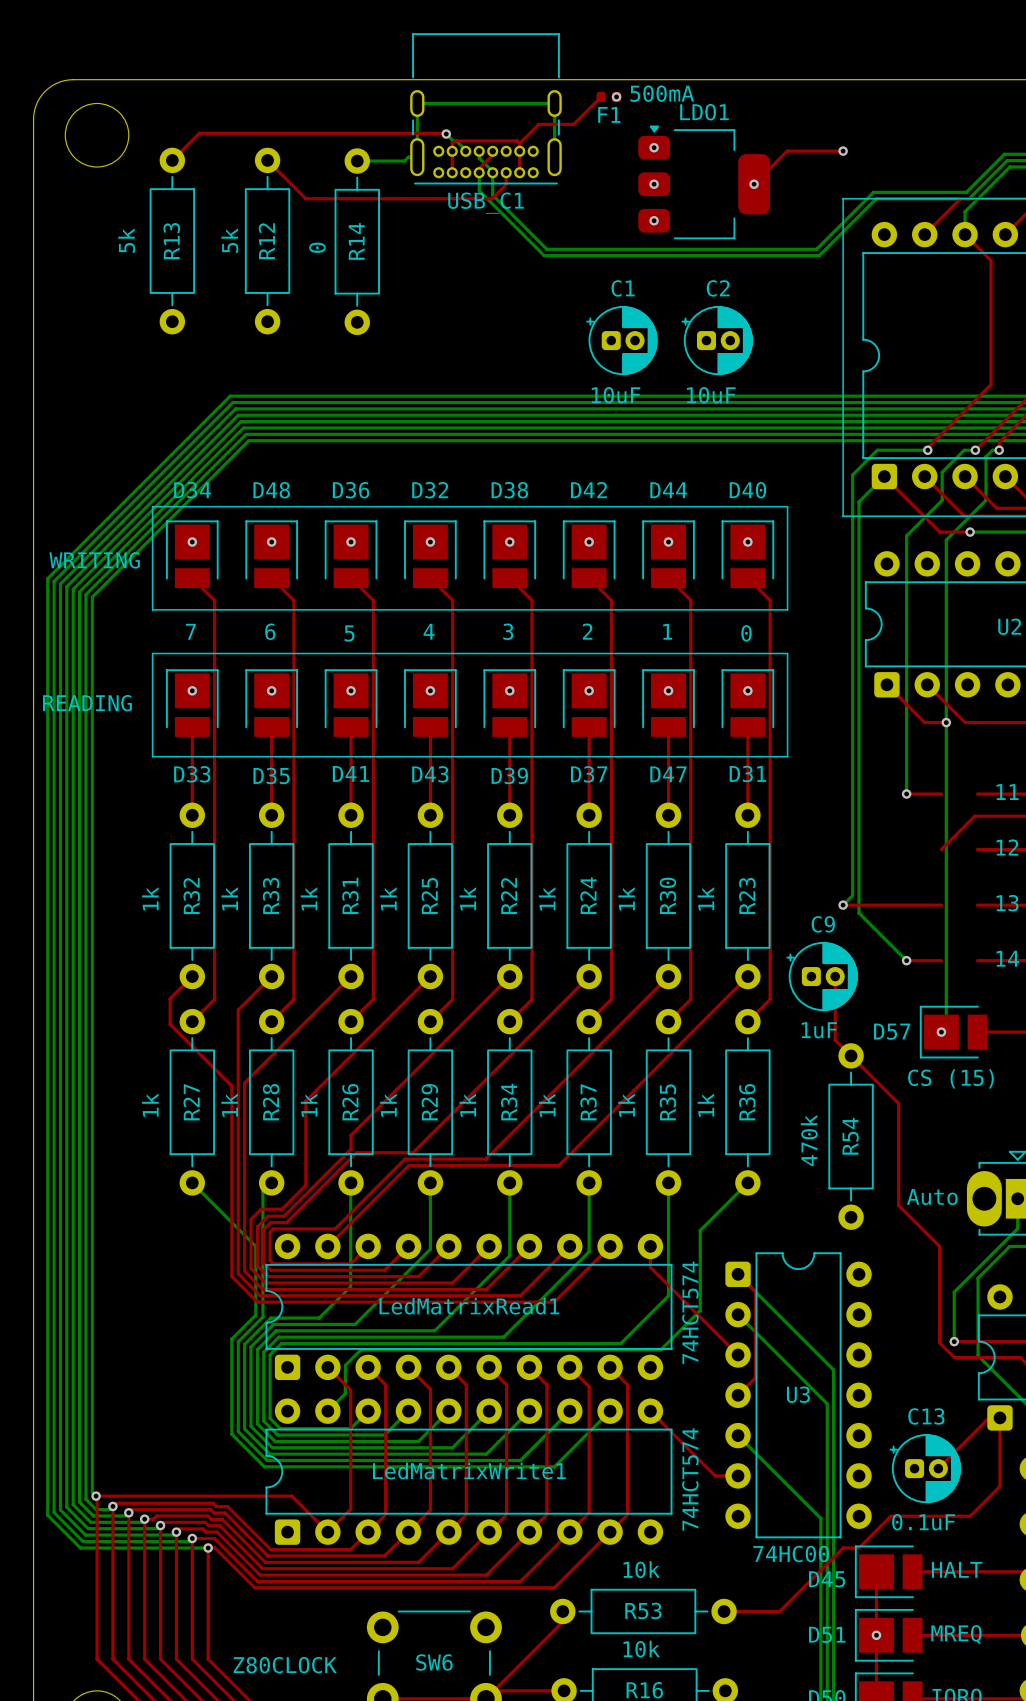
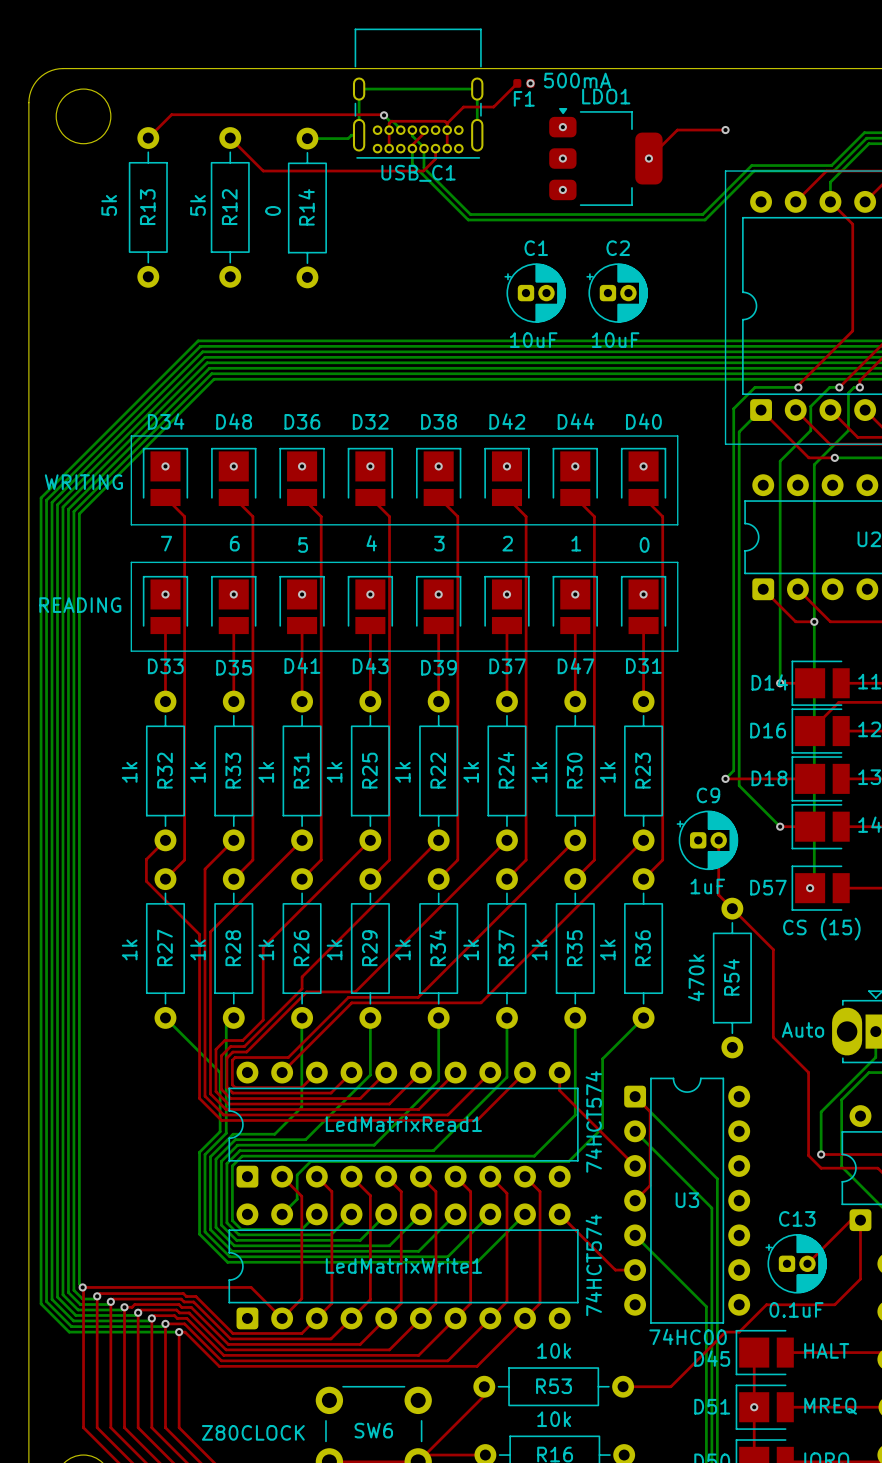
D14: none -> (820, 683)
D16: none -> (820, 731)
D18: none -> (820, 778)
part: none -> (820, 826)

